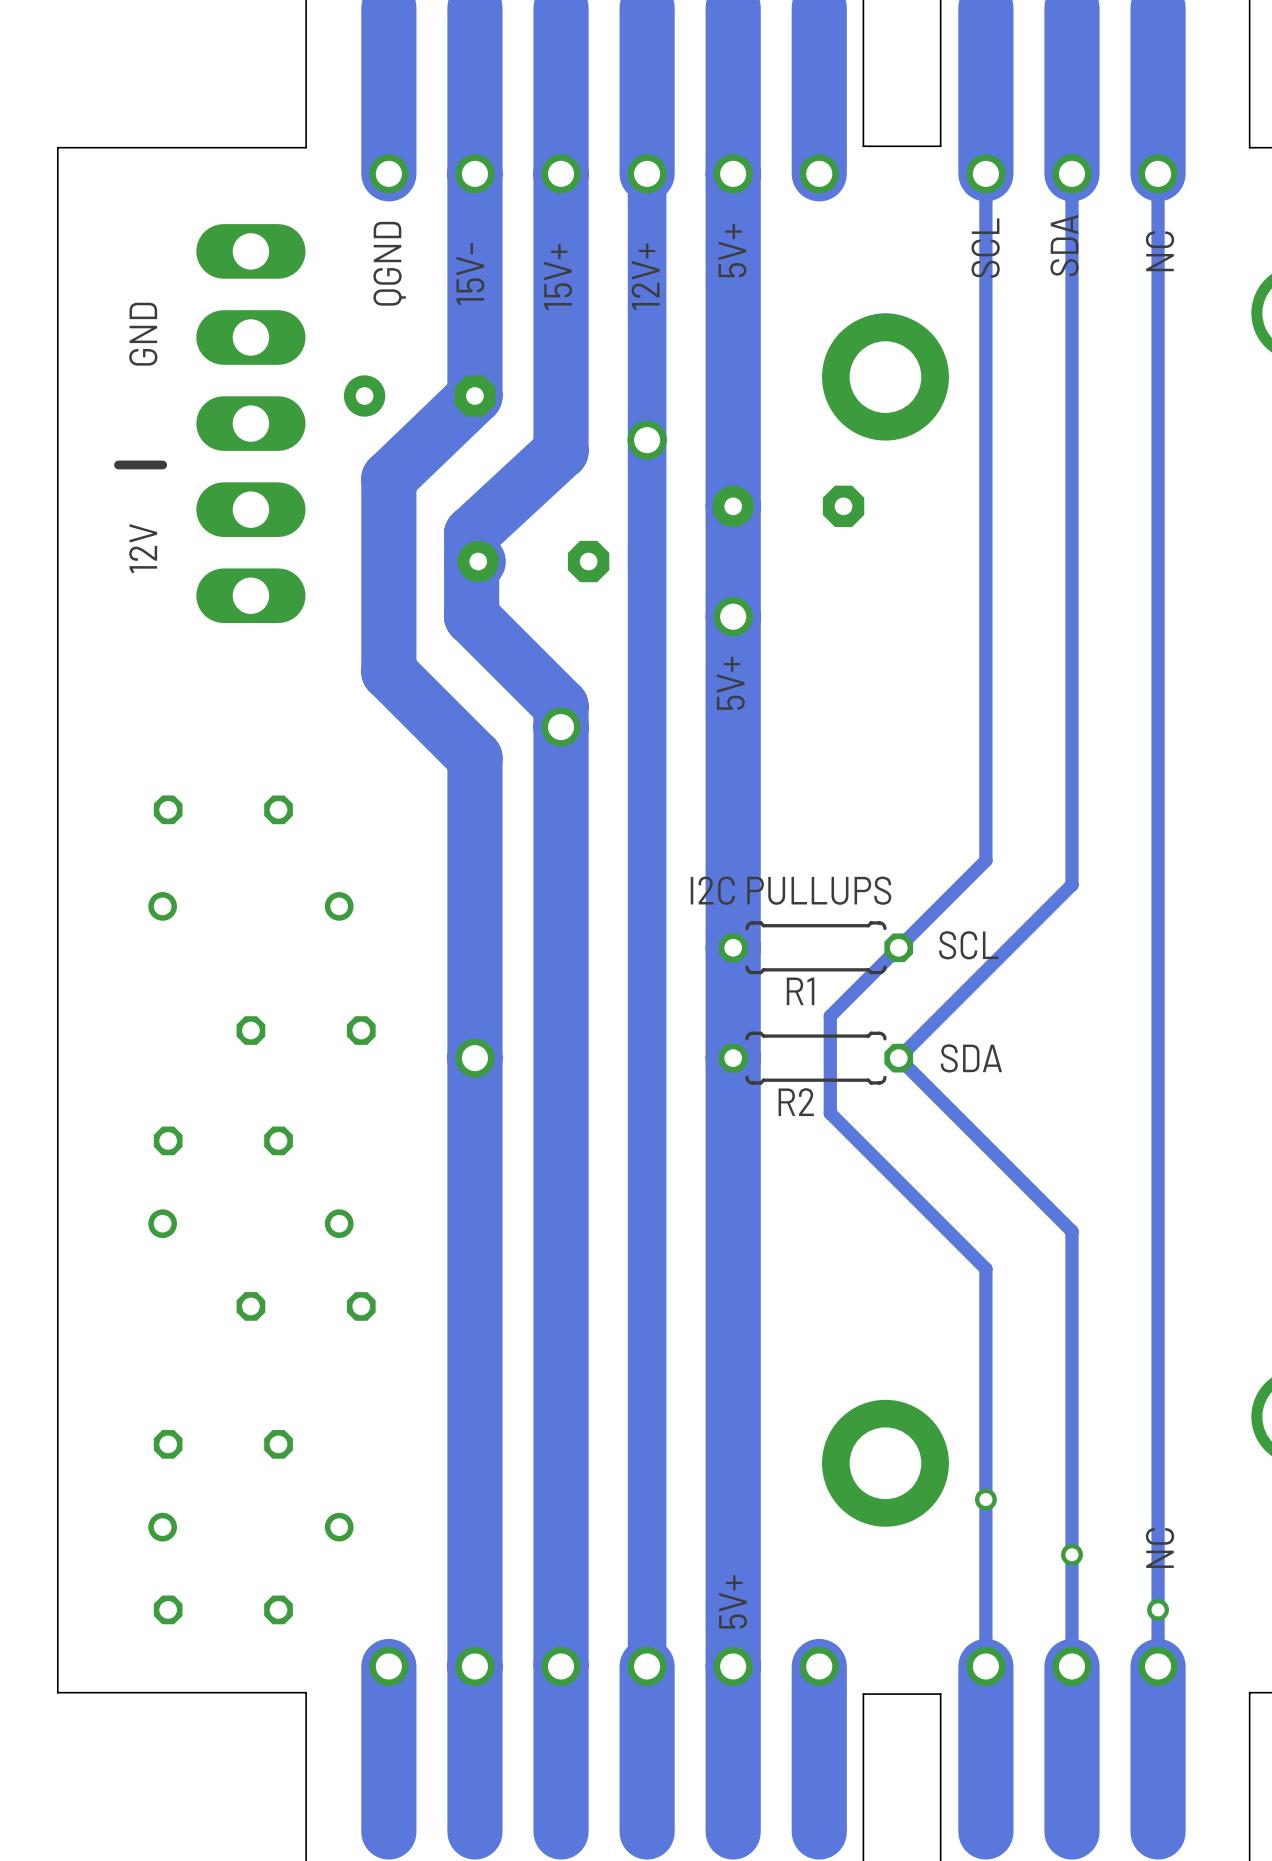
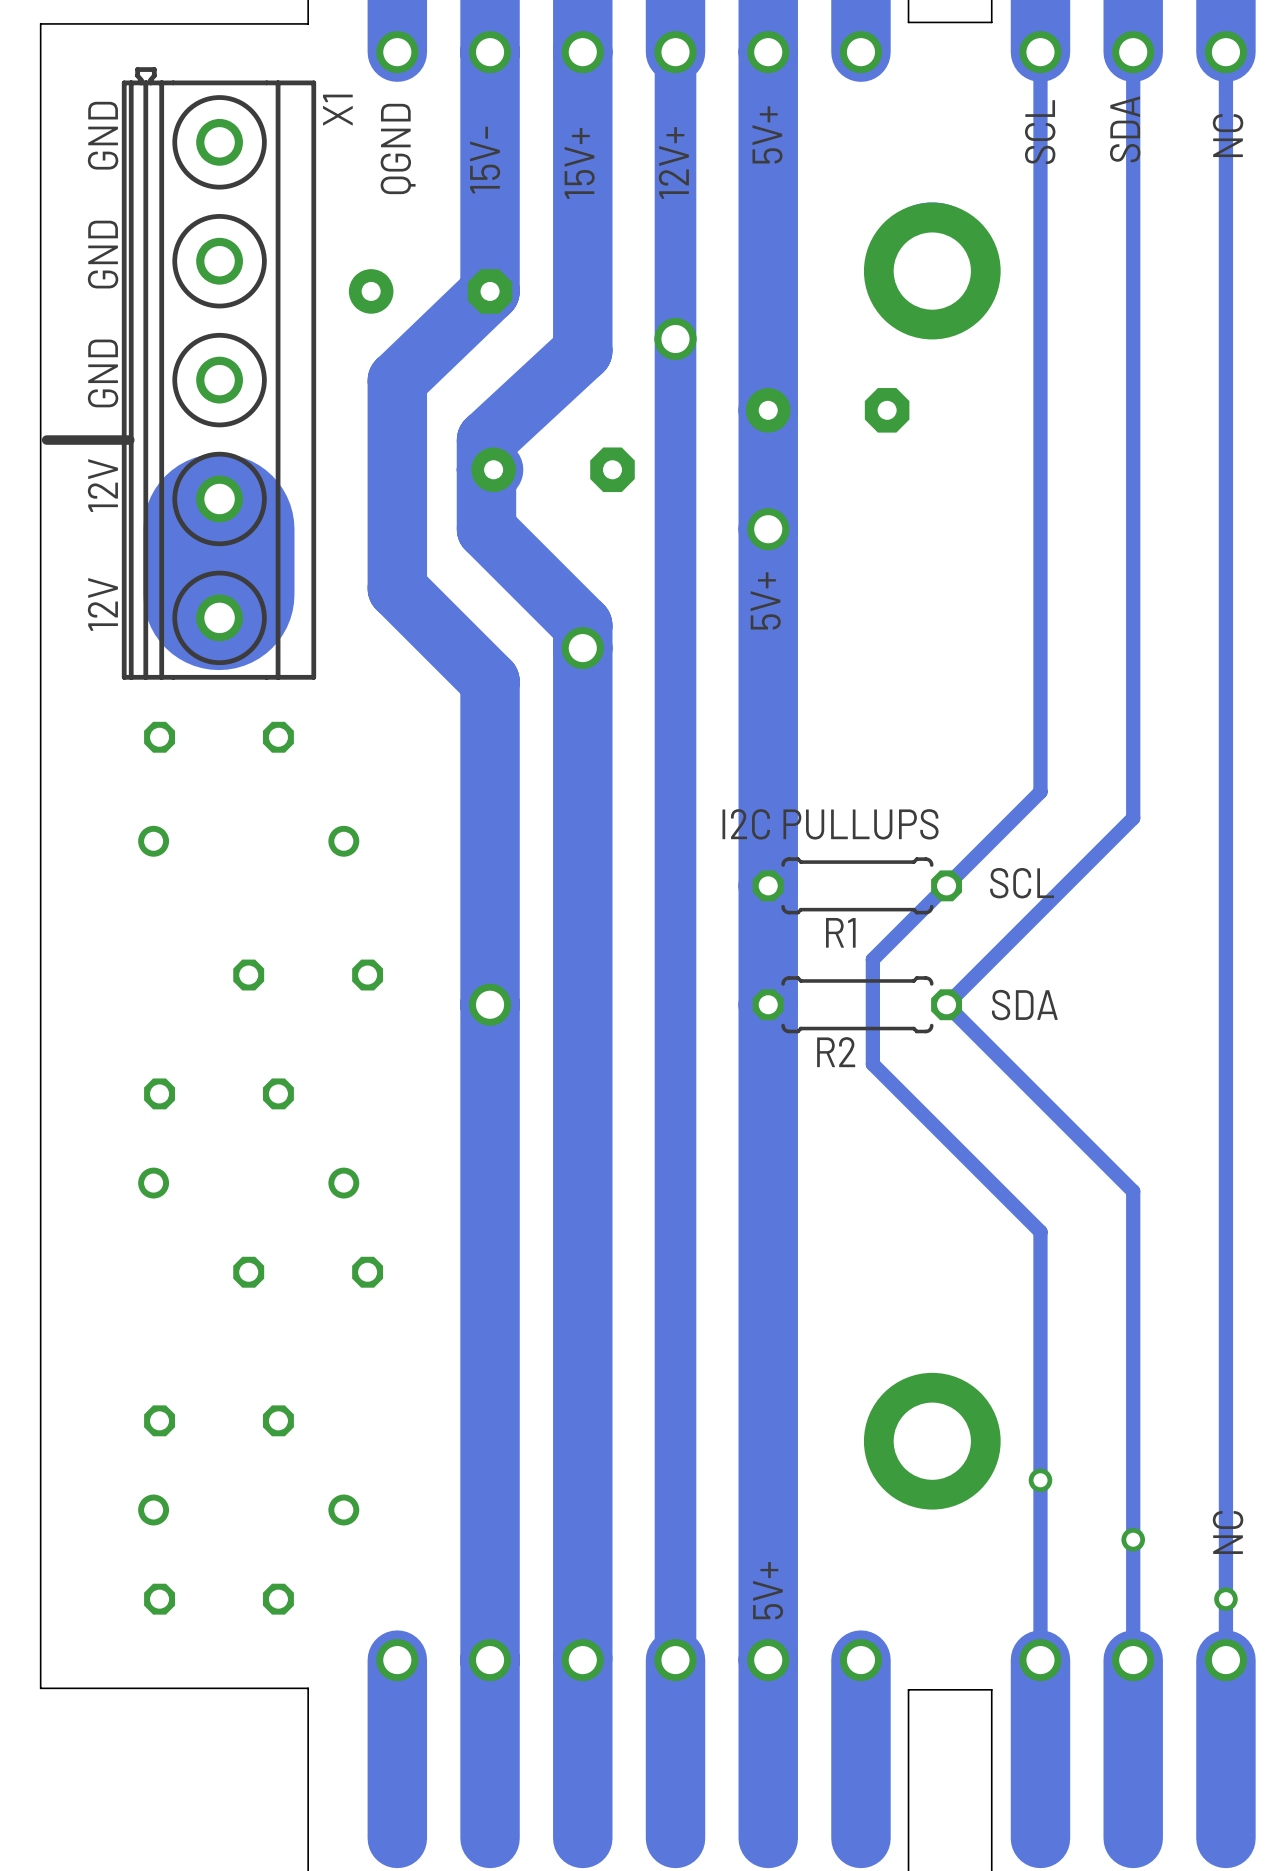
text: none -> GND (103, 135)
text position: GND (143, 334) -> GND (103, 254)
part: (250, 423) -> none
line: (162, 464) (118, 464) -> none
text: none -> GND (103, 373)
X1: none -> (218, 373)
line: none -> (129, 440) (46, 440)
text position: 12V (143, 548) -> 12V (102, 485)
track: none -> (218, 529) (218, 594)
text: none -> 12V (102, 604)

